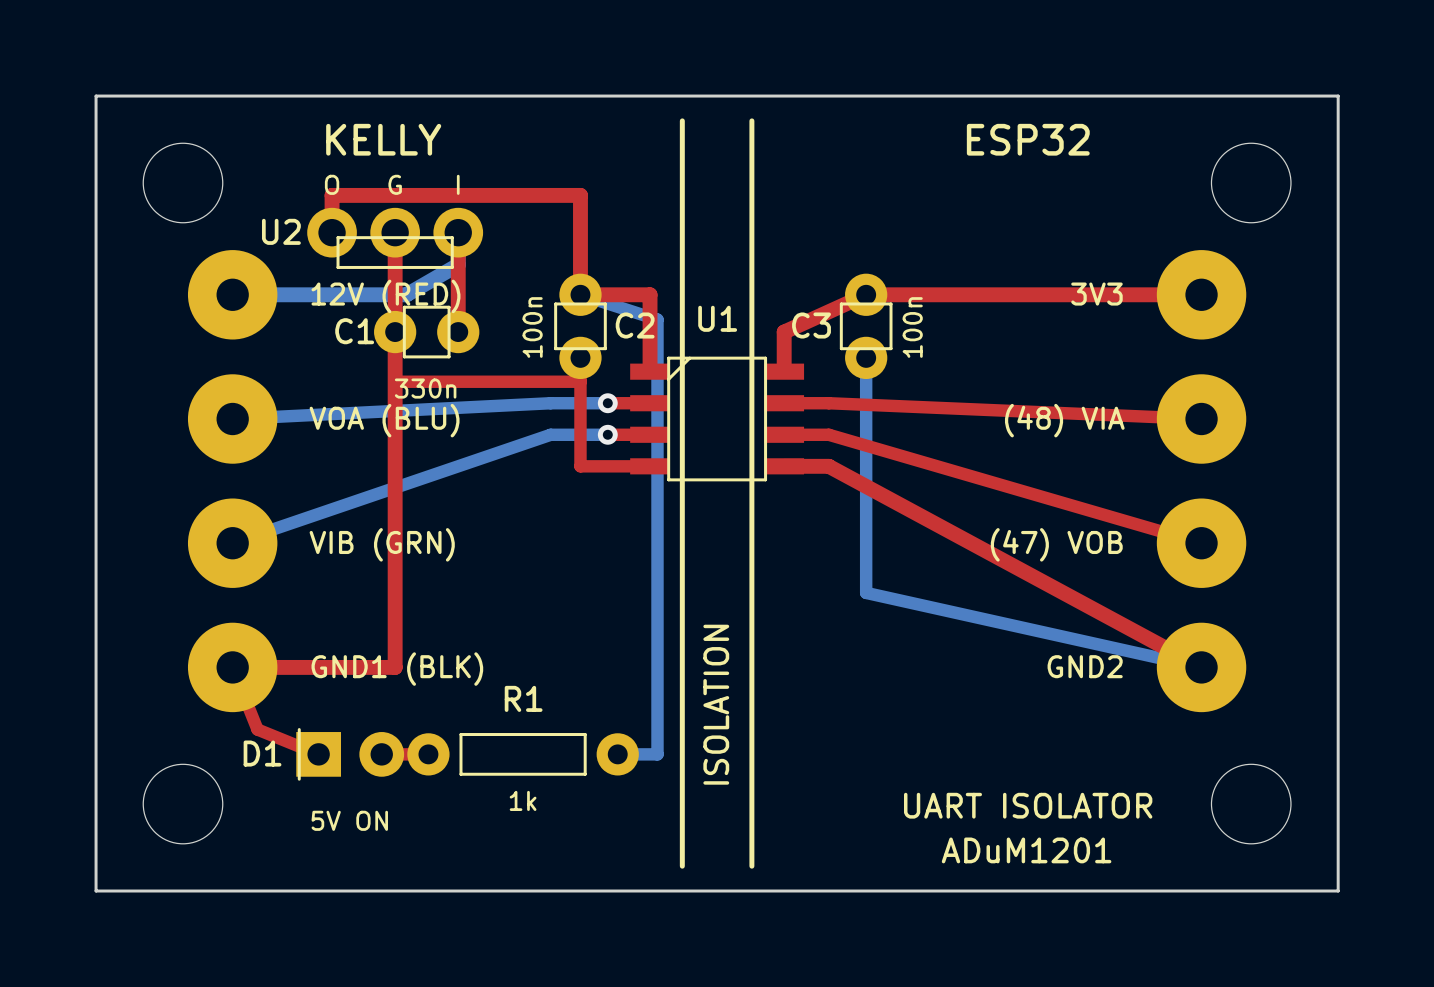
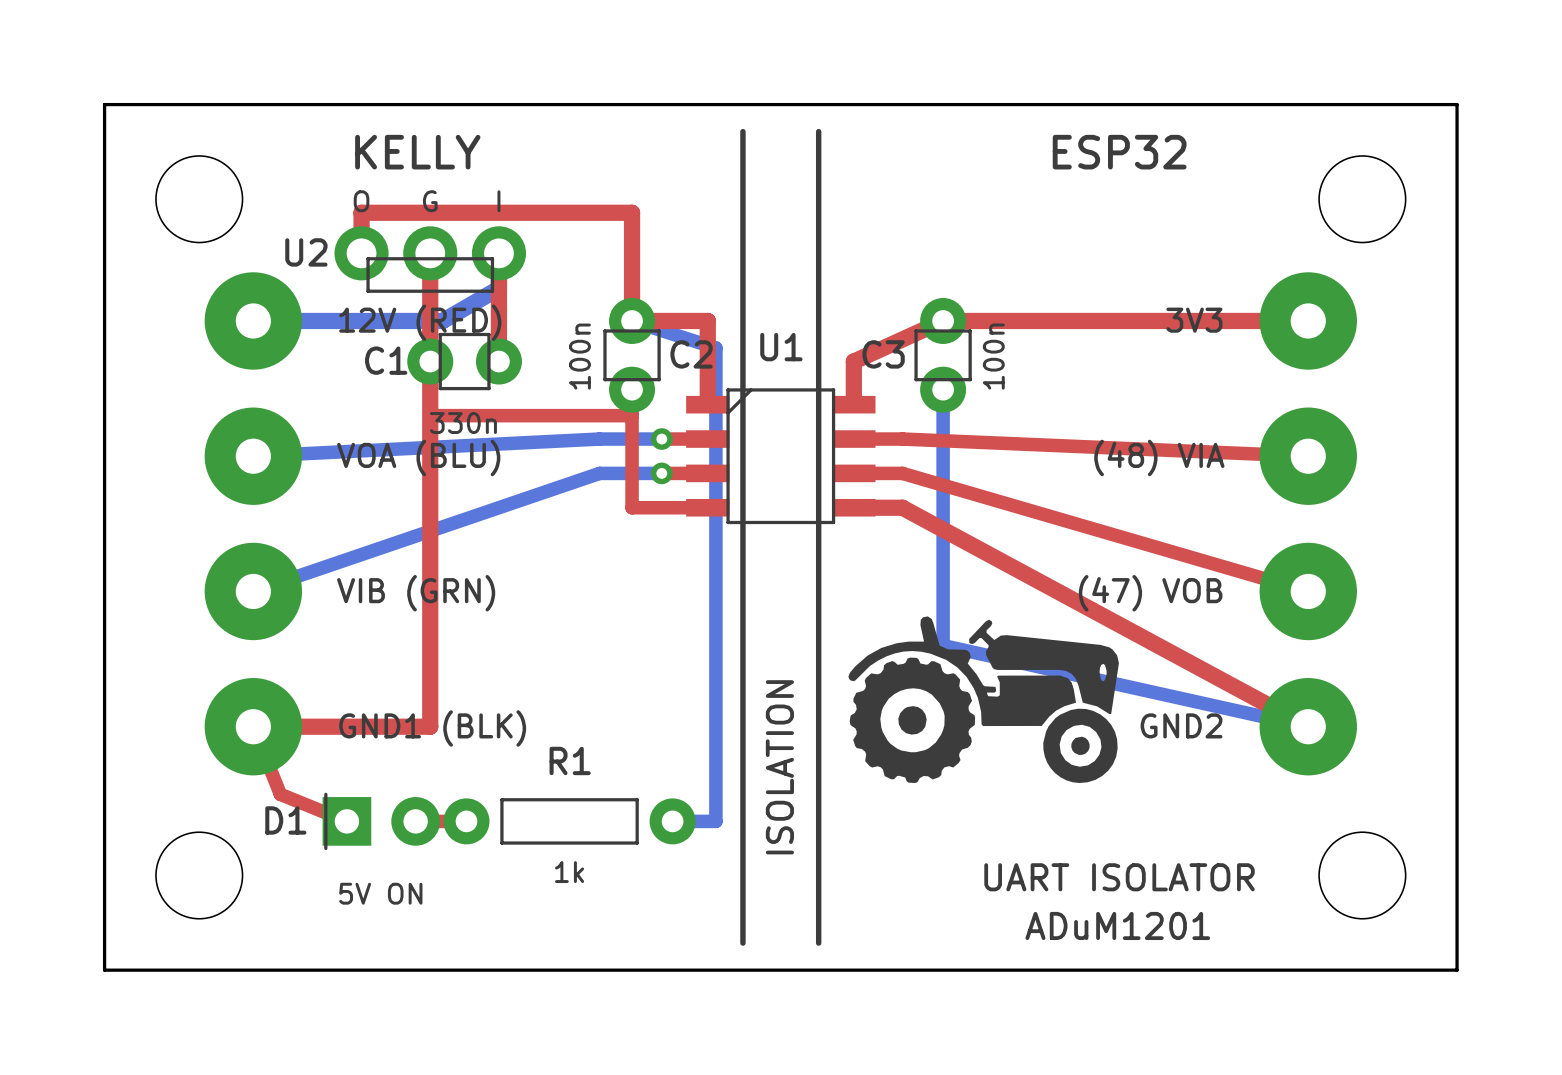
drawing: none -> [848, 616, 1119, 784]

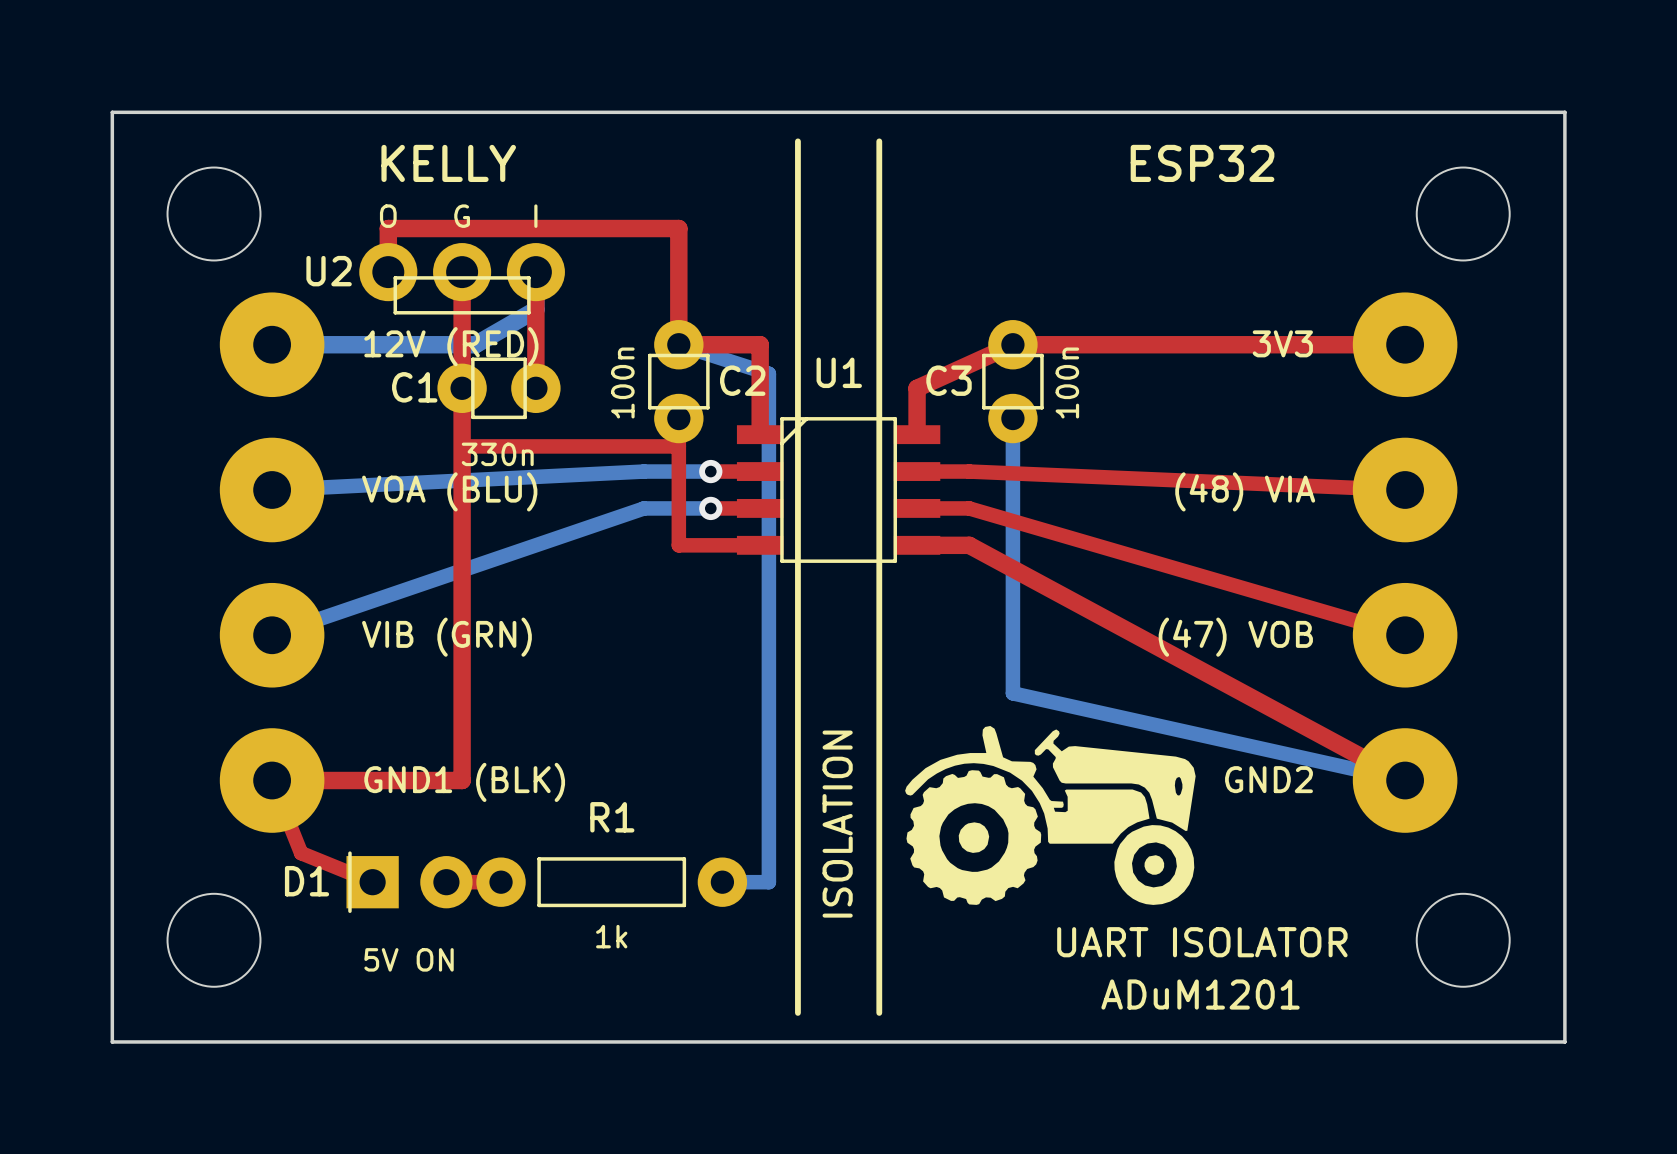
drawing position: (1044, 666) -> (1115, 780)
drawing position: (962, 671) -> (1027, 784)
drawing position: (912, 720) -> (973, 837)
drawing position: (912, 720) -> (973, 837)
drawing position: (1080, 745) -> (1154, 865)
drawing position: (1080, 745) -> (1154, 864)

